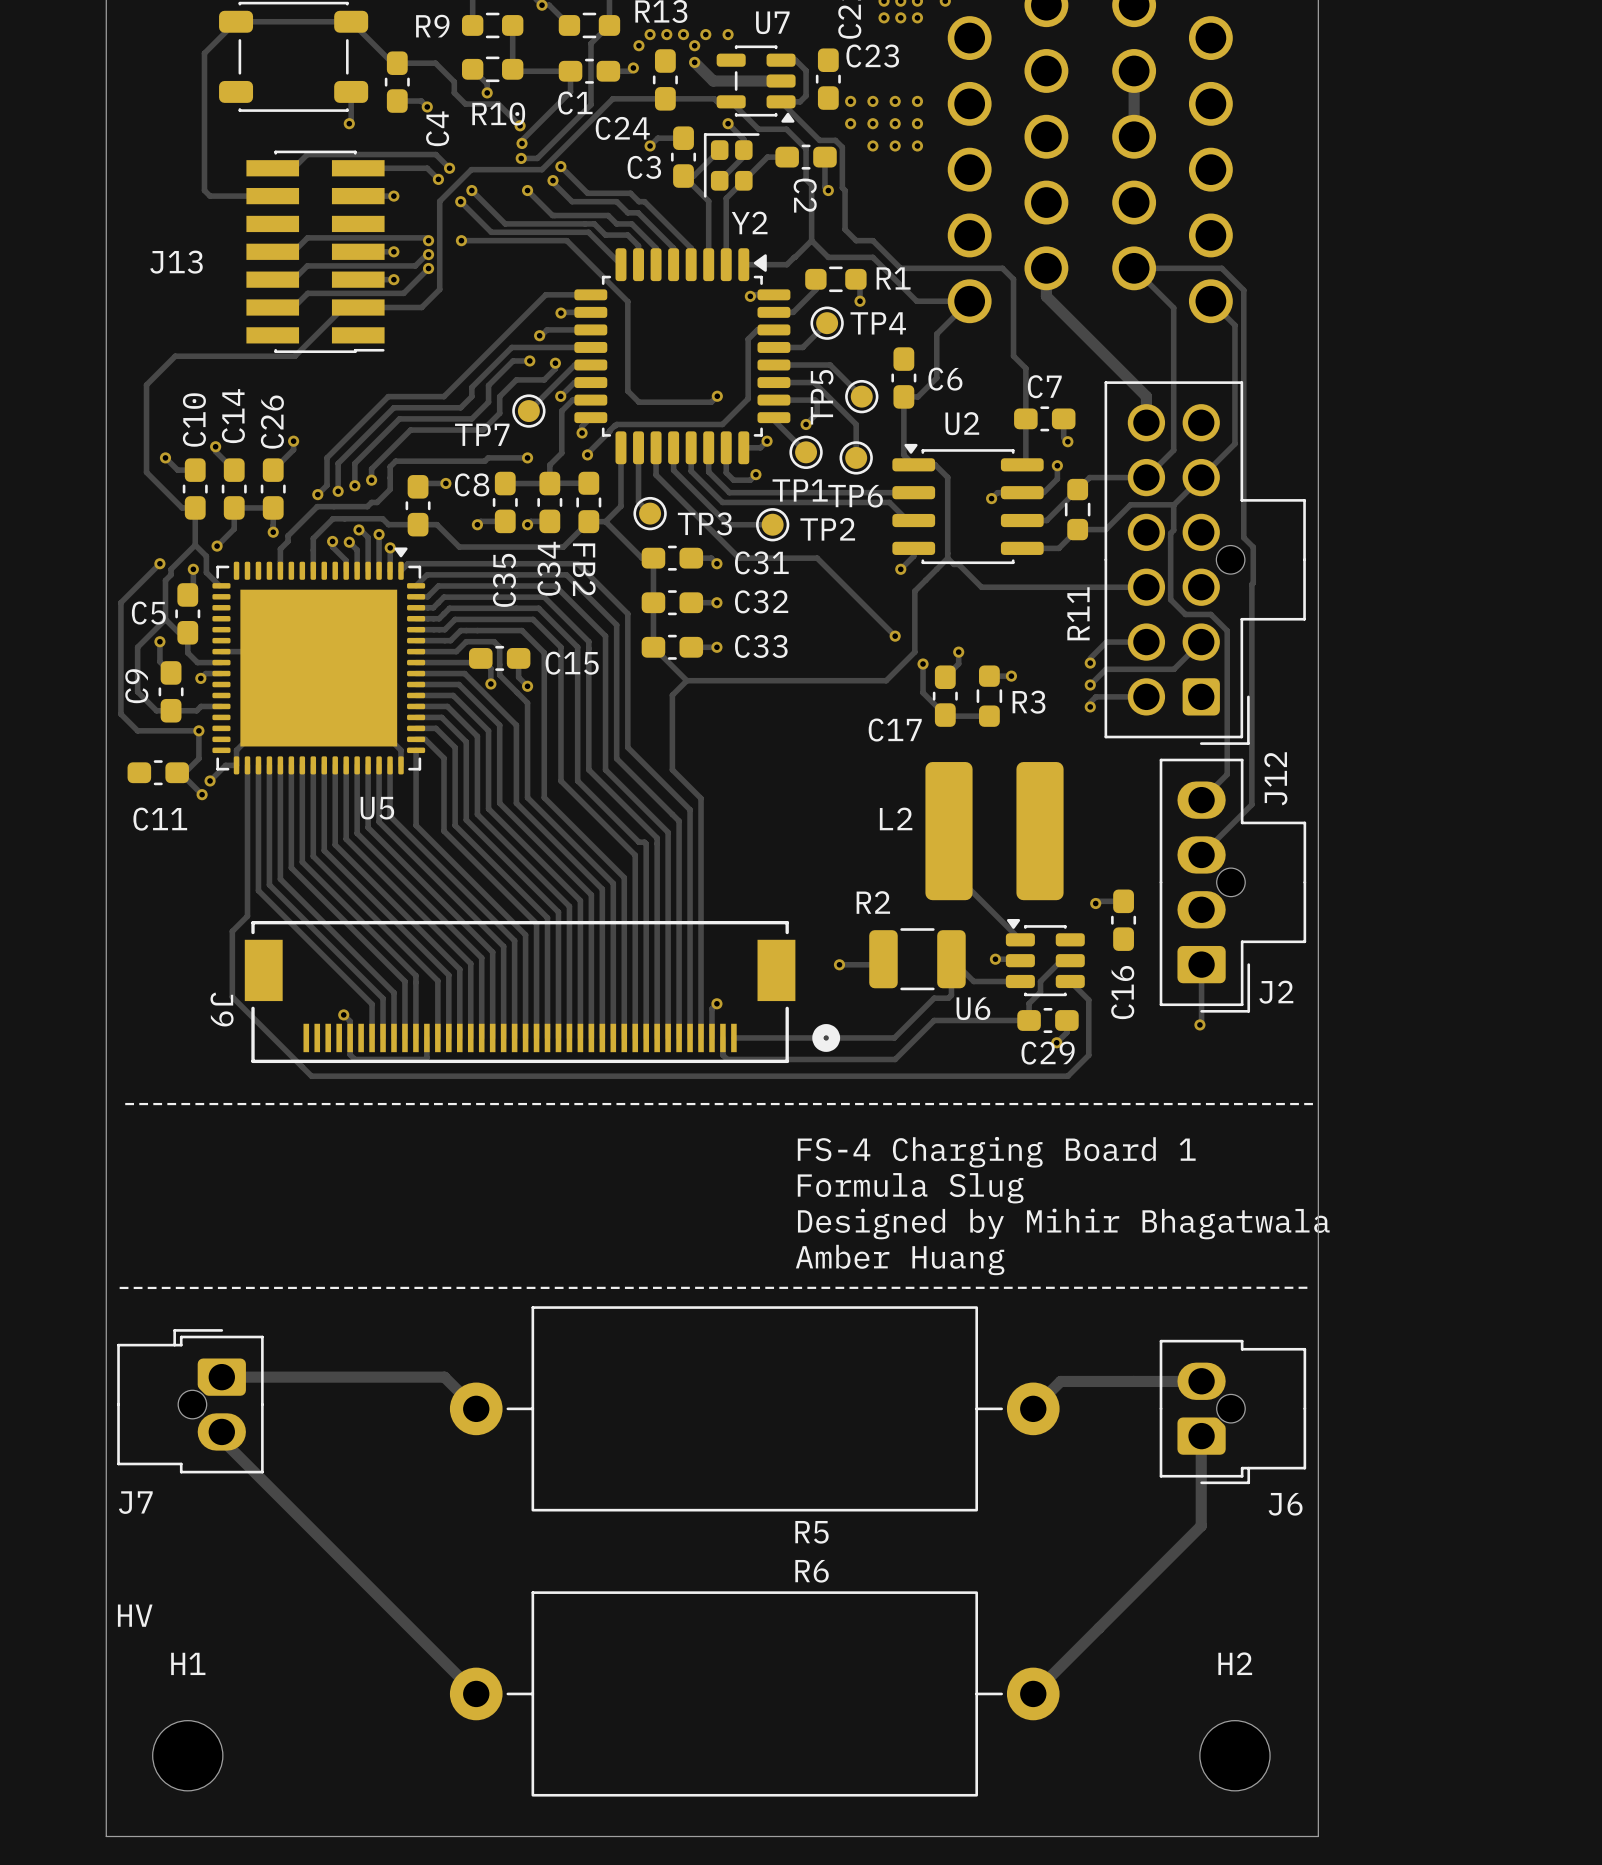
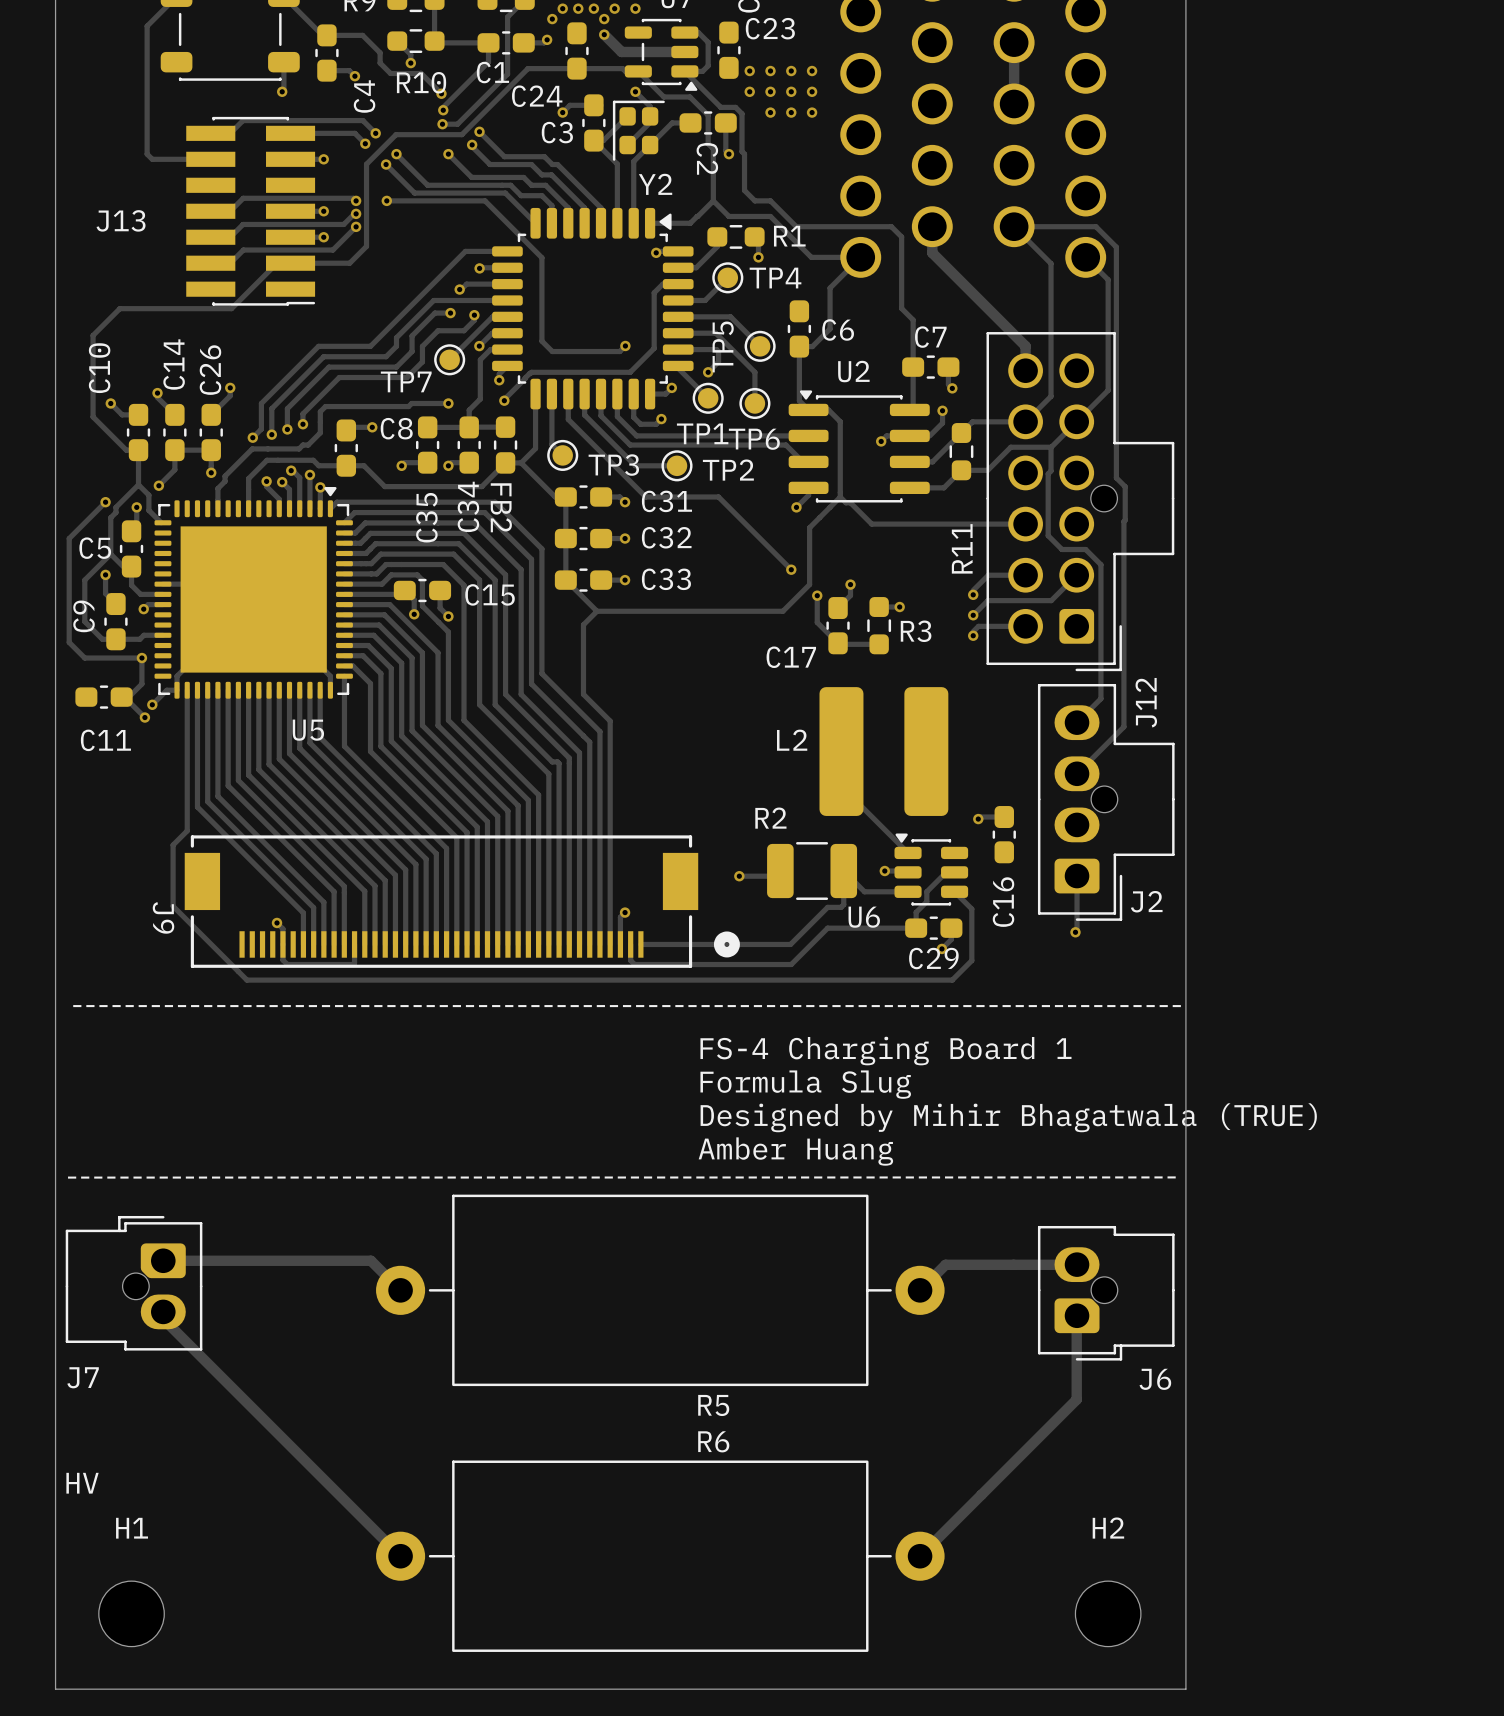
C10 name position: C10 (194, 420) -> C10 (99, 368)
text: Designed by Mihir Bhagatwala (1063, 1223) -> Designed by Mihir Bhagatwala (TRUE) (1008, 1117)

